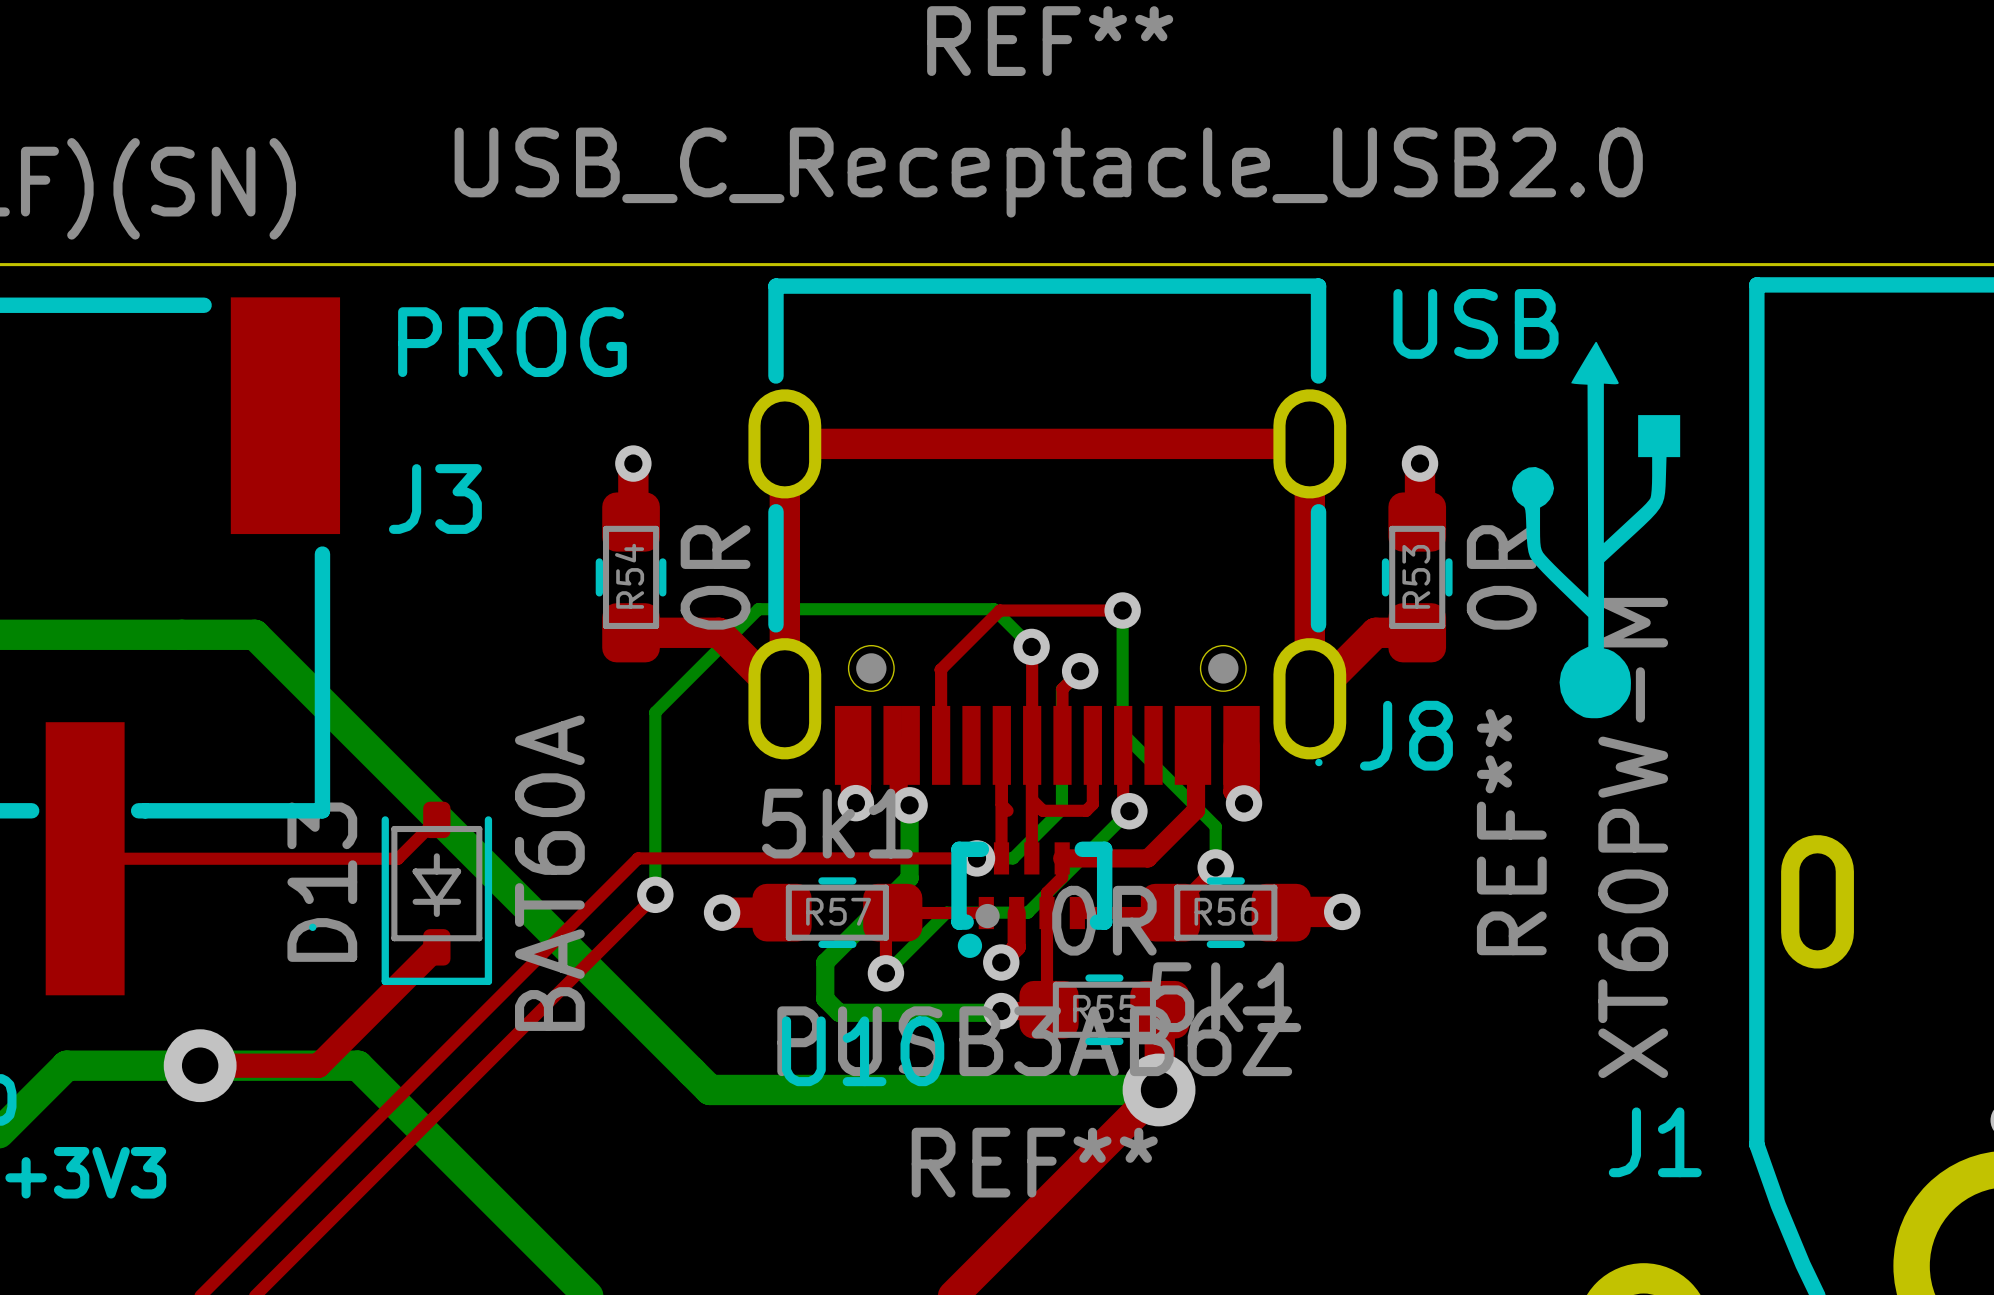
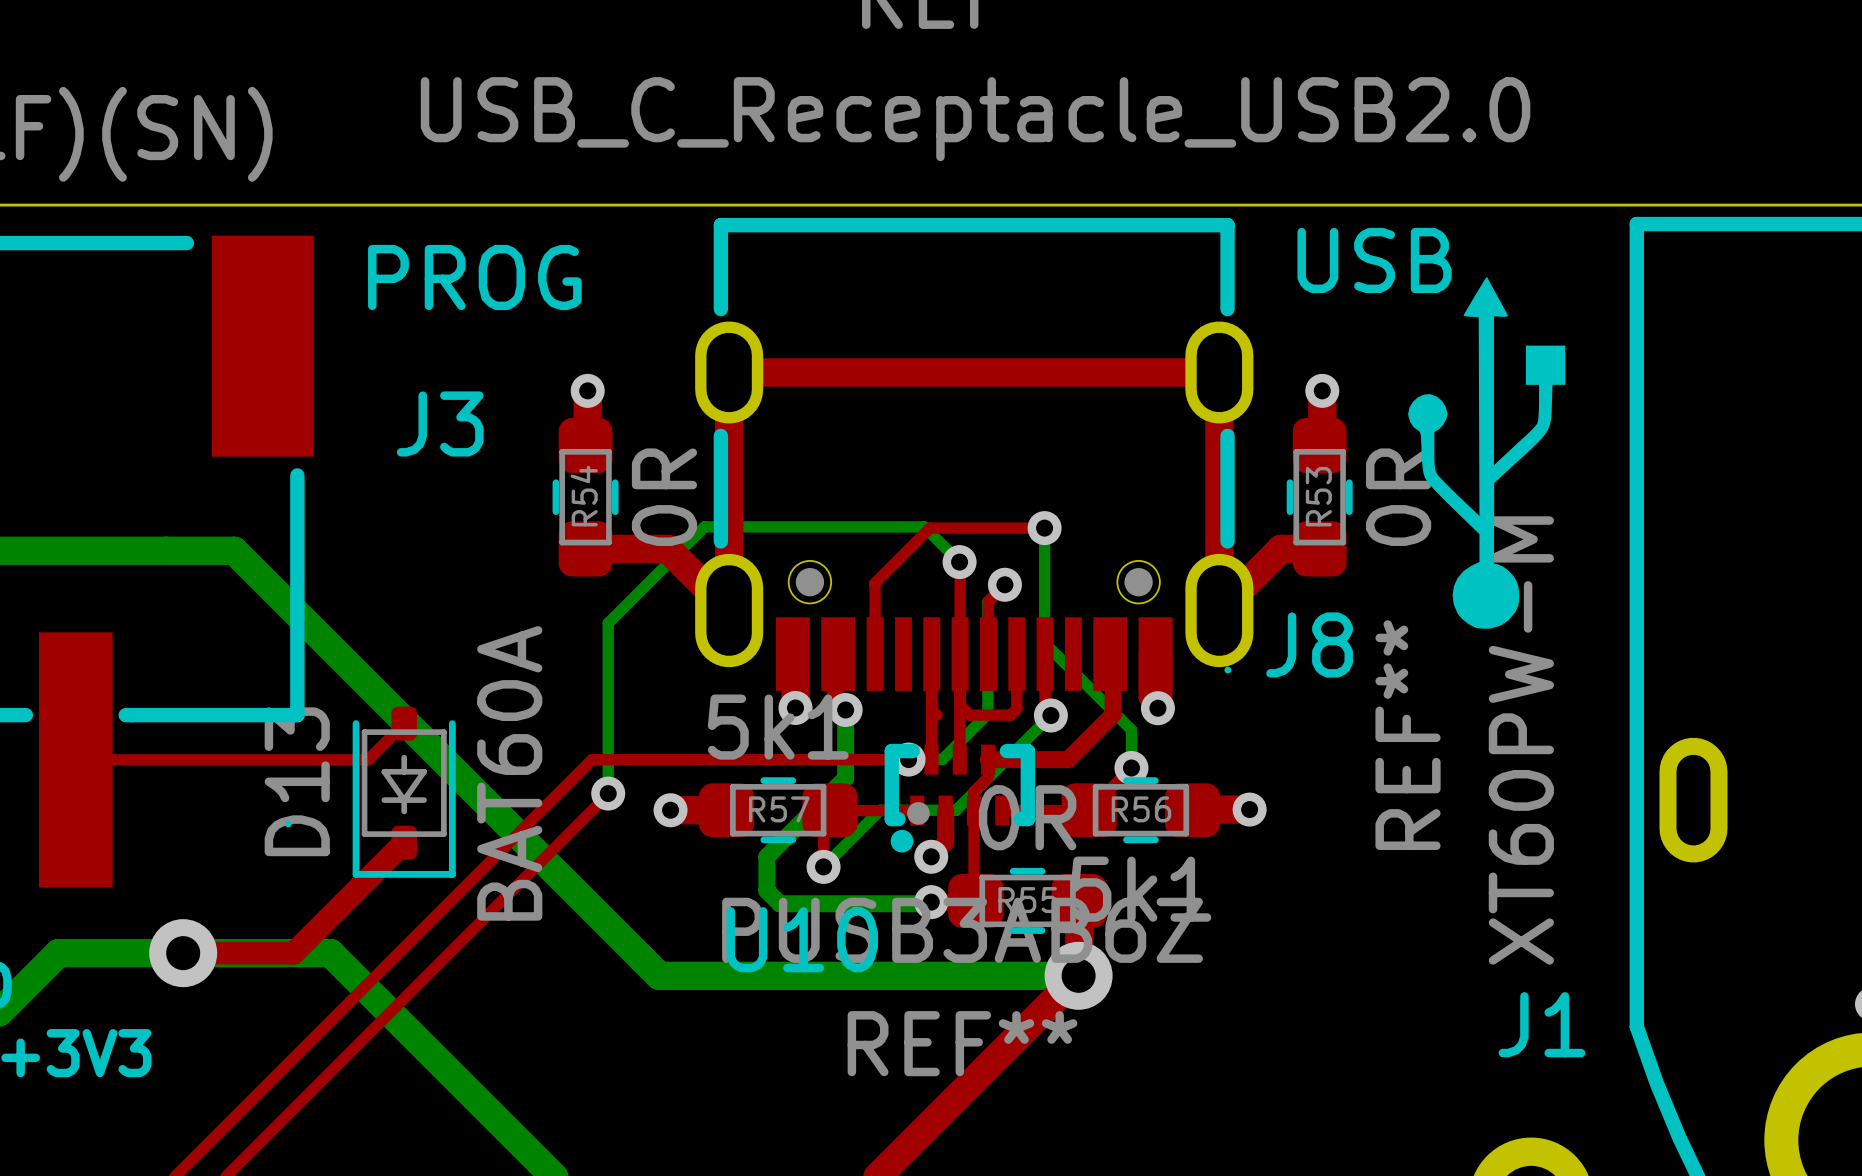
J3 name position: J3 (435, 499) -> J3 (440, 423)

